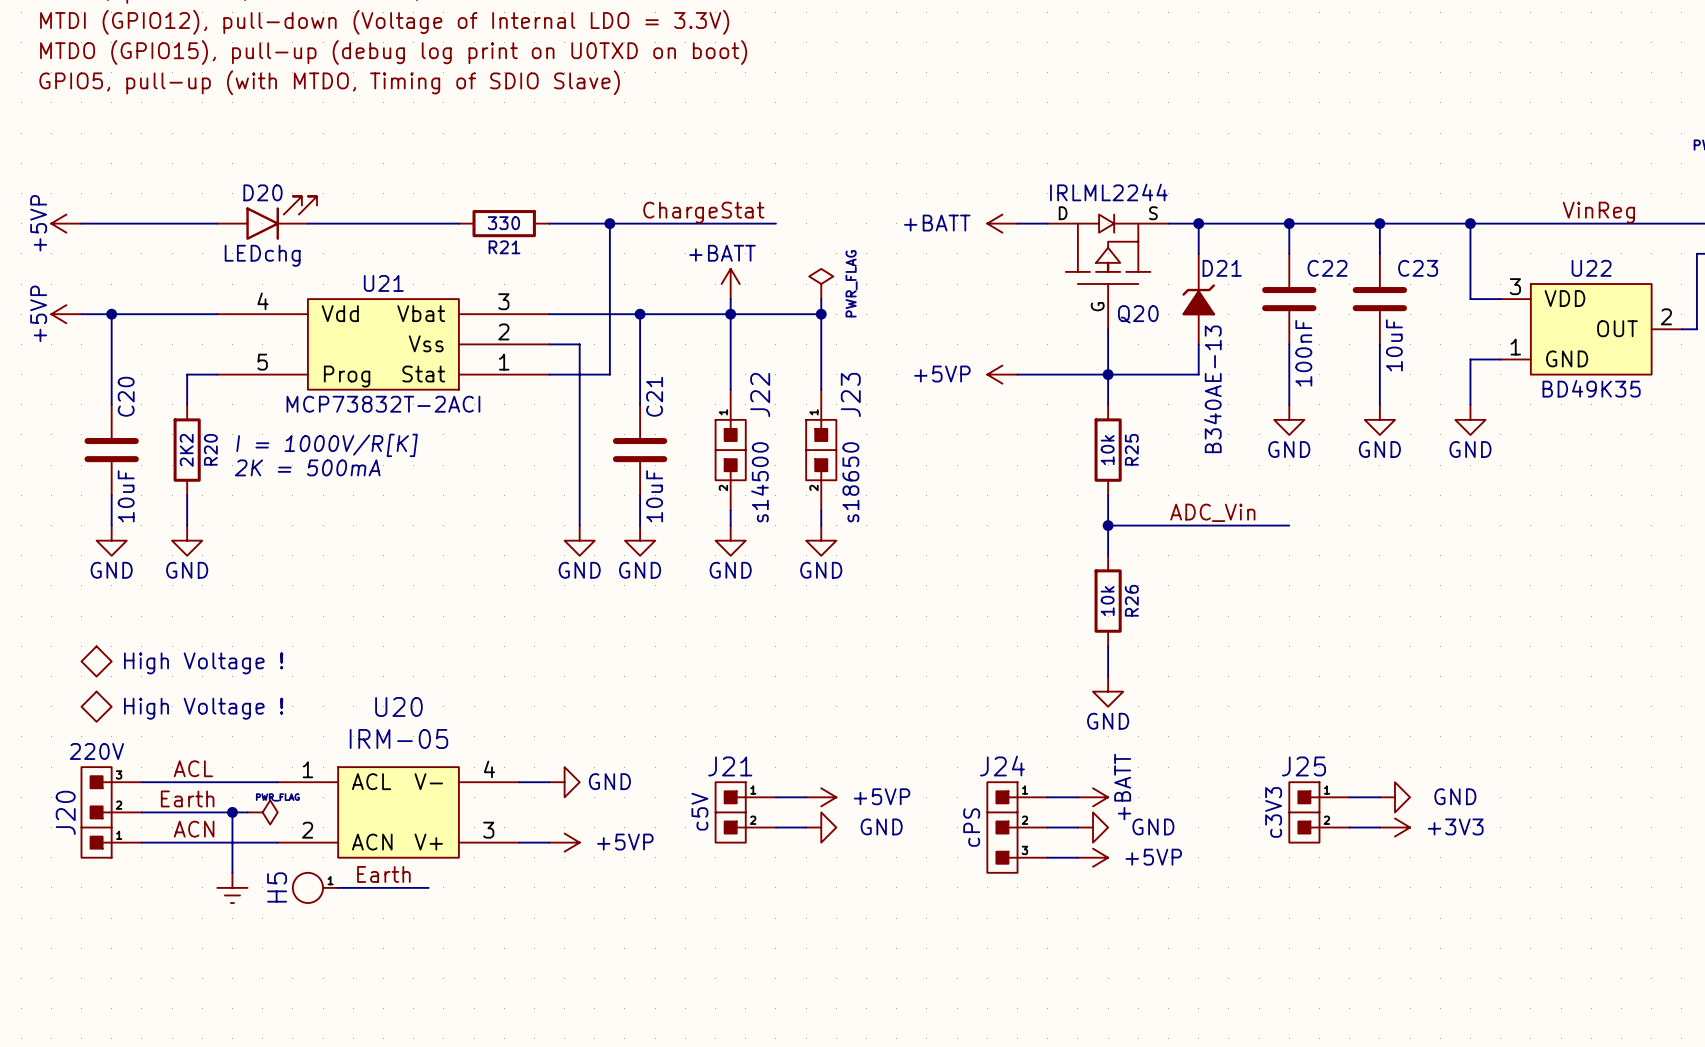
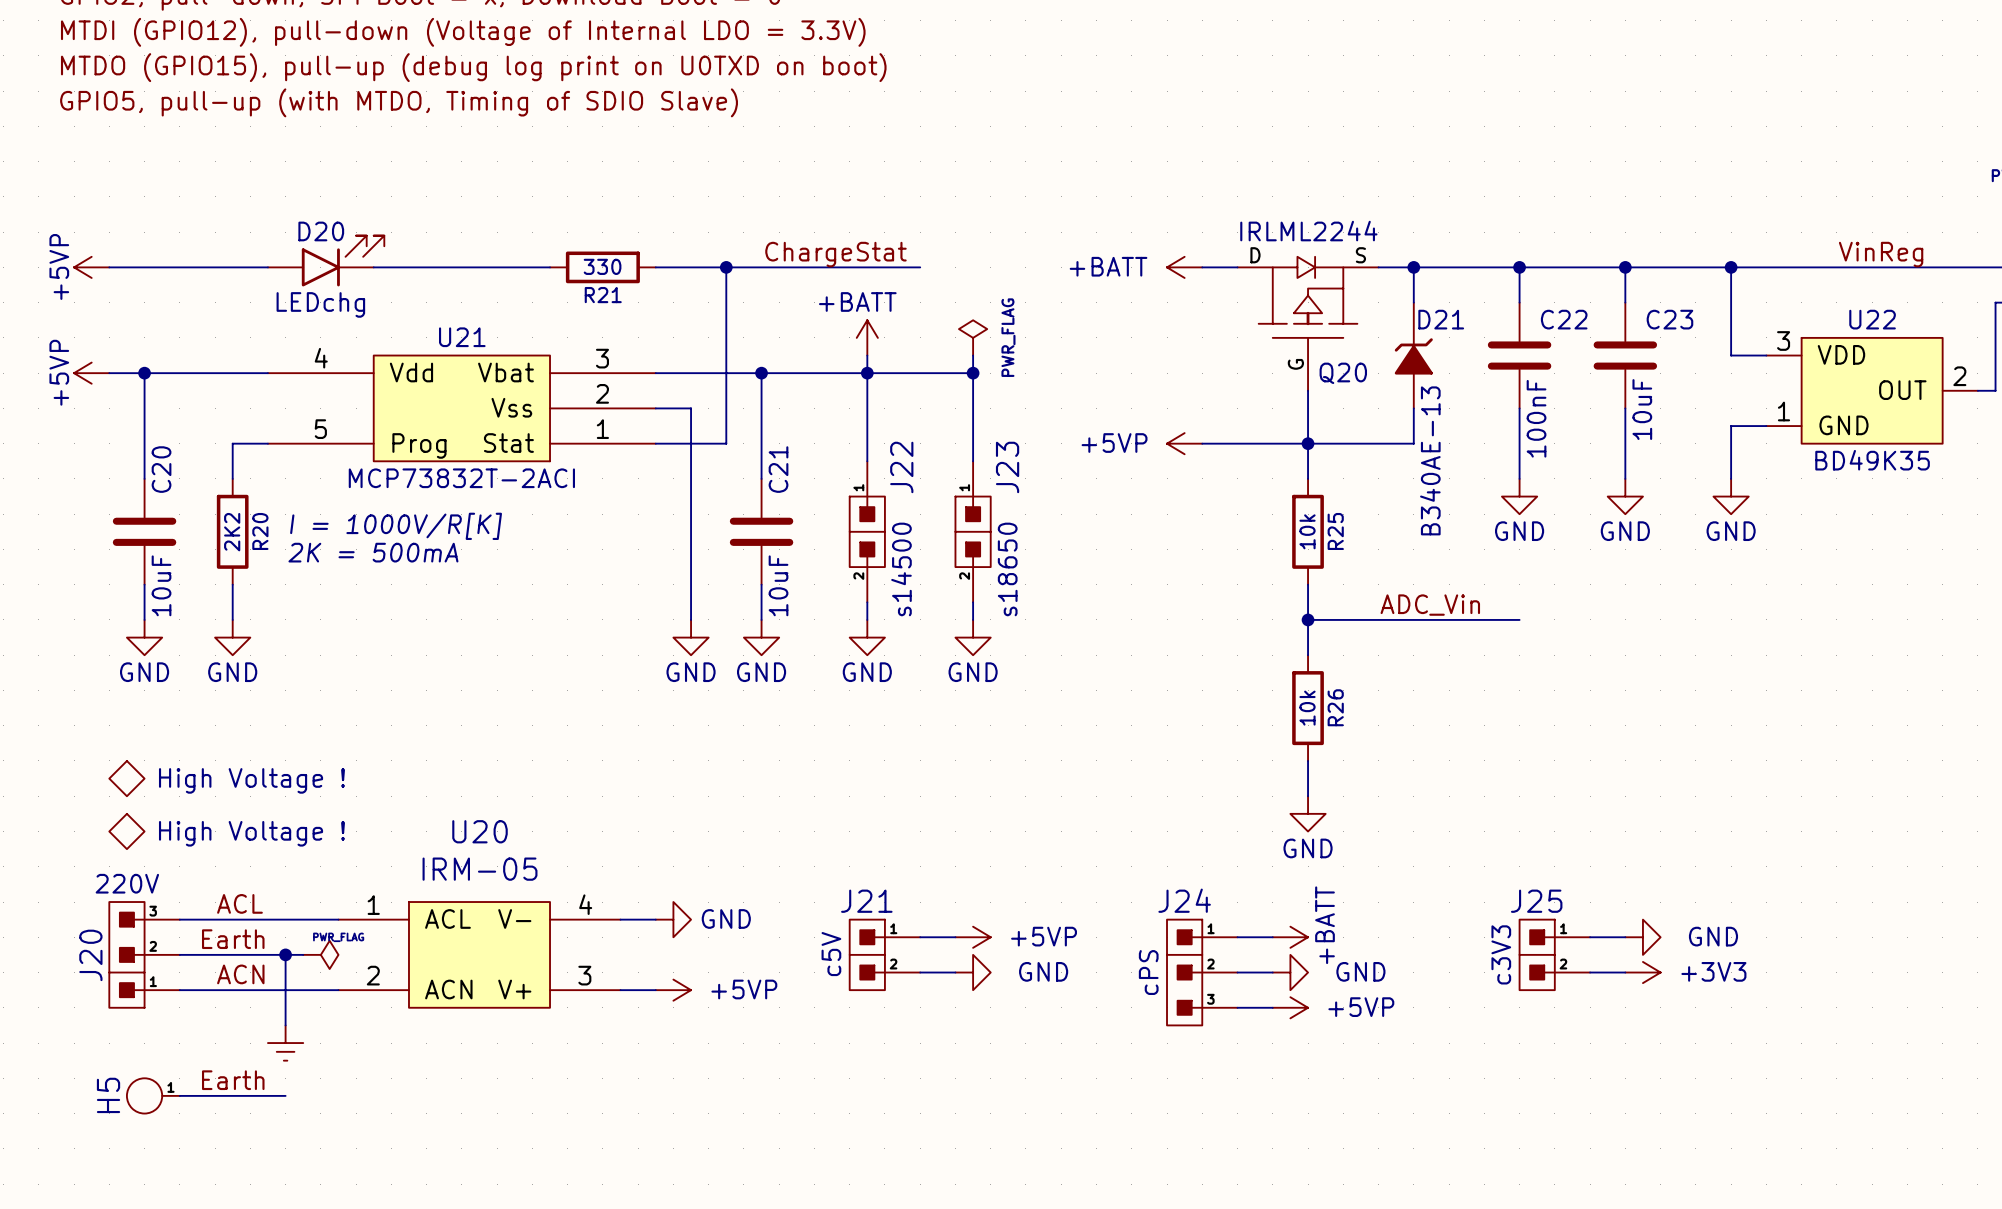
label position: Earth (383, 874) -> Earth (233, 1080)
H5 position: (315, 887) -> (153, 1095)
wire: (338, 887) (428, 887) -> (179, 1095) (285, 1095)

